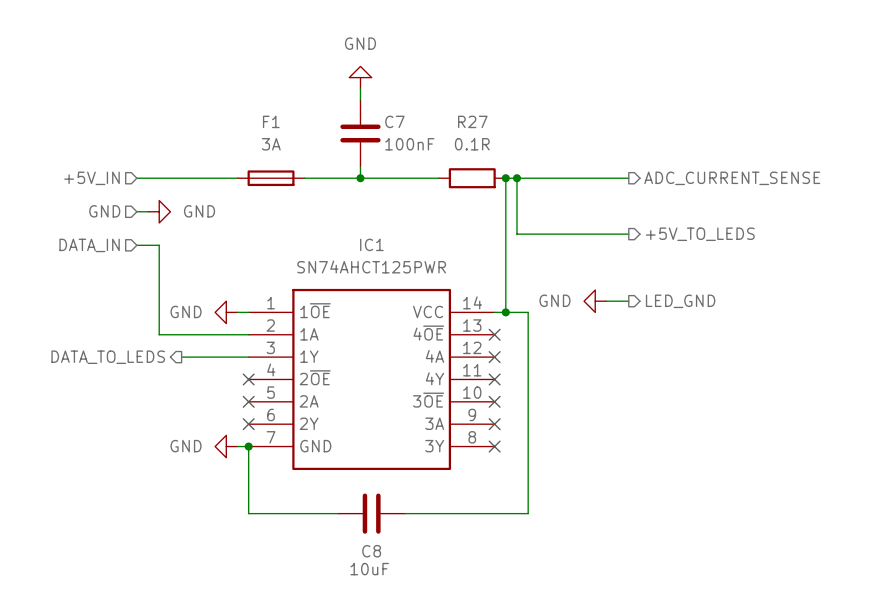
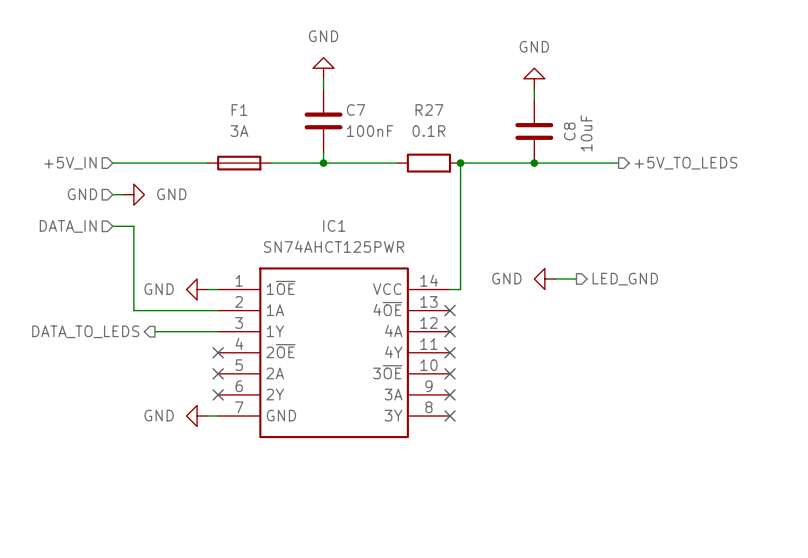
power symbol: none -> GND (534, 78)
wire: none -> (534, 89) (534, 99)
wire: (516, 178) (516, 234) (628, 234) -> none
junction: (516, 178) -> none
junction: none -> (534, 163)
wire: none -> (576, 163) (618, 163)
hierarchical label: ADC_CURRENT_SENSE (732, 178) -> none
hierarchical label position: +5V_TO_LEDS (700, 234) -> +5V_TO_LEDS (686, 163)
wire: (505, 312) (528, 312) (528, 513) (405, 513) -> none
junction: (505, 312) -> none
wire: (248, 446) (248, 513) (338, 513) -> none
junction: (248, 446) -> none
C8 rotation: 0° (371, 513) -> 90° clockwise (534, 131)
C8 position: (371, 513) -> (534, 131)
C8 name position: C8 (371, 551) -> C8 (569, 131)
C8 value position: 10uF (369, 569) -> 10uF (586, 133)

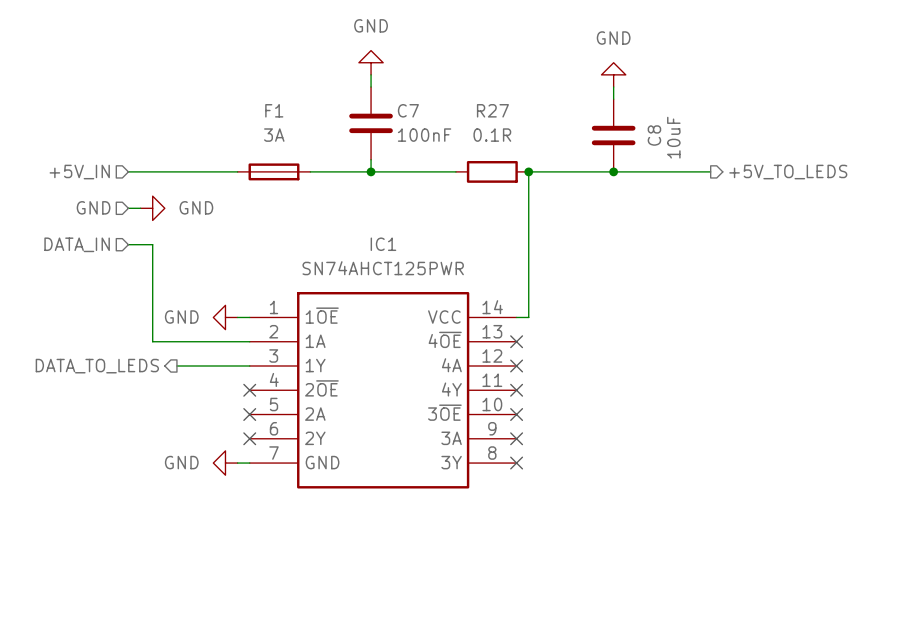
power symbol: GND (544, 279) -> none
wire: (555, 279) (576, 279) -> none
hierarchical label: LED_GND (625, 279) -> none

